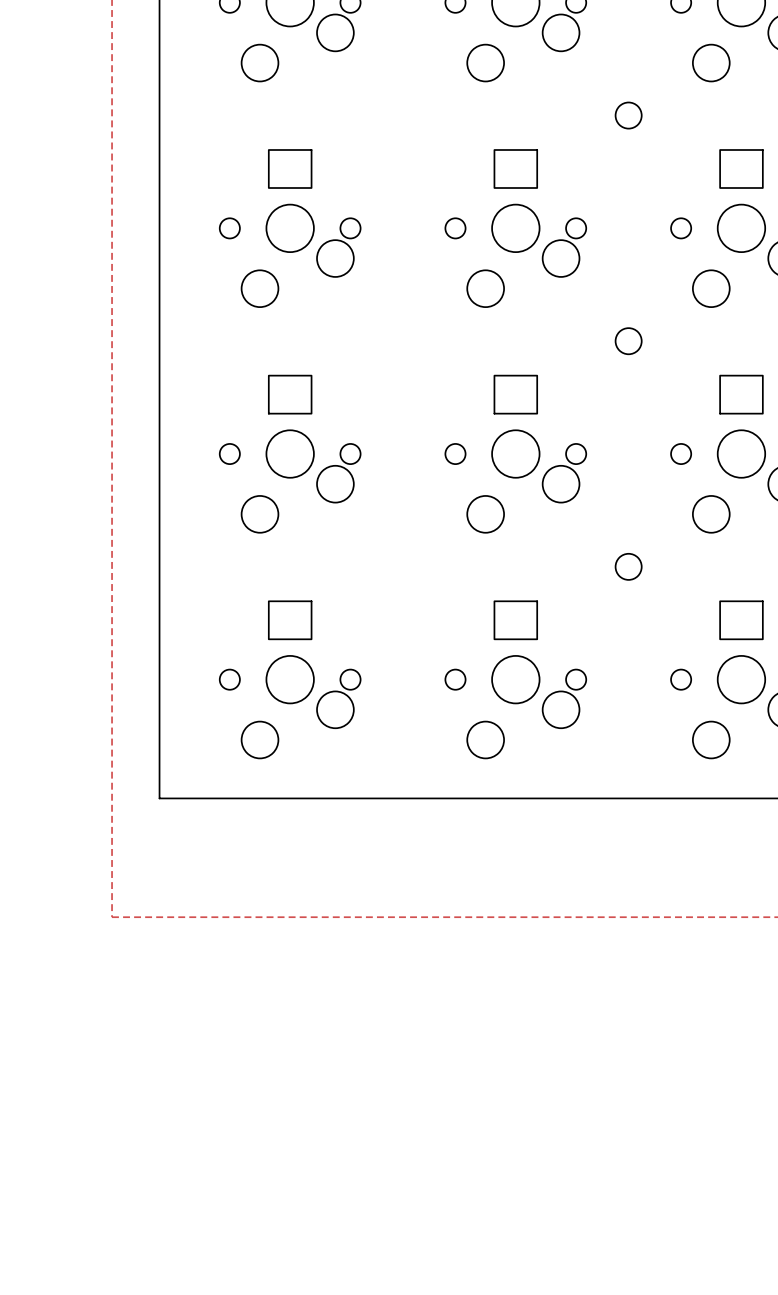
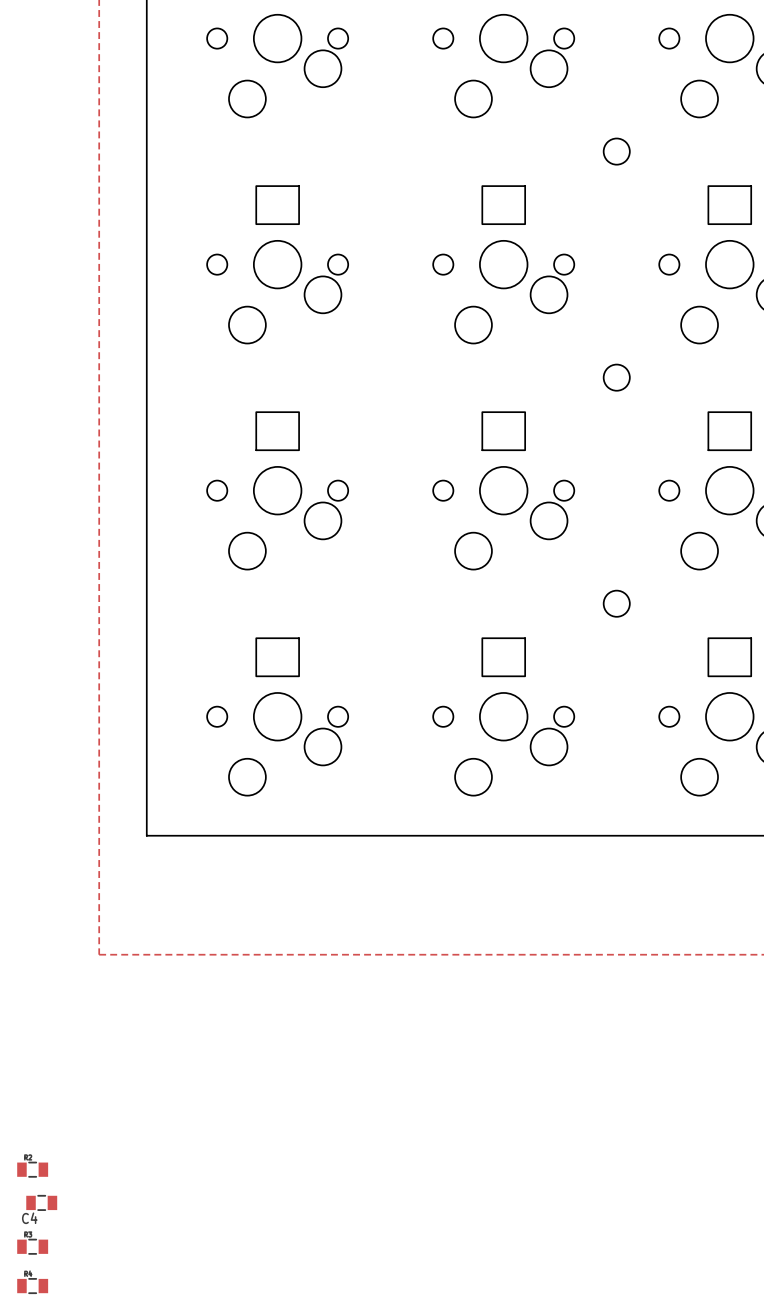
part: none -> (32, 1169)
C4: none -> (41, 1202)
part: none -> (32, 1246)
part: none -> (32, 1286)

